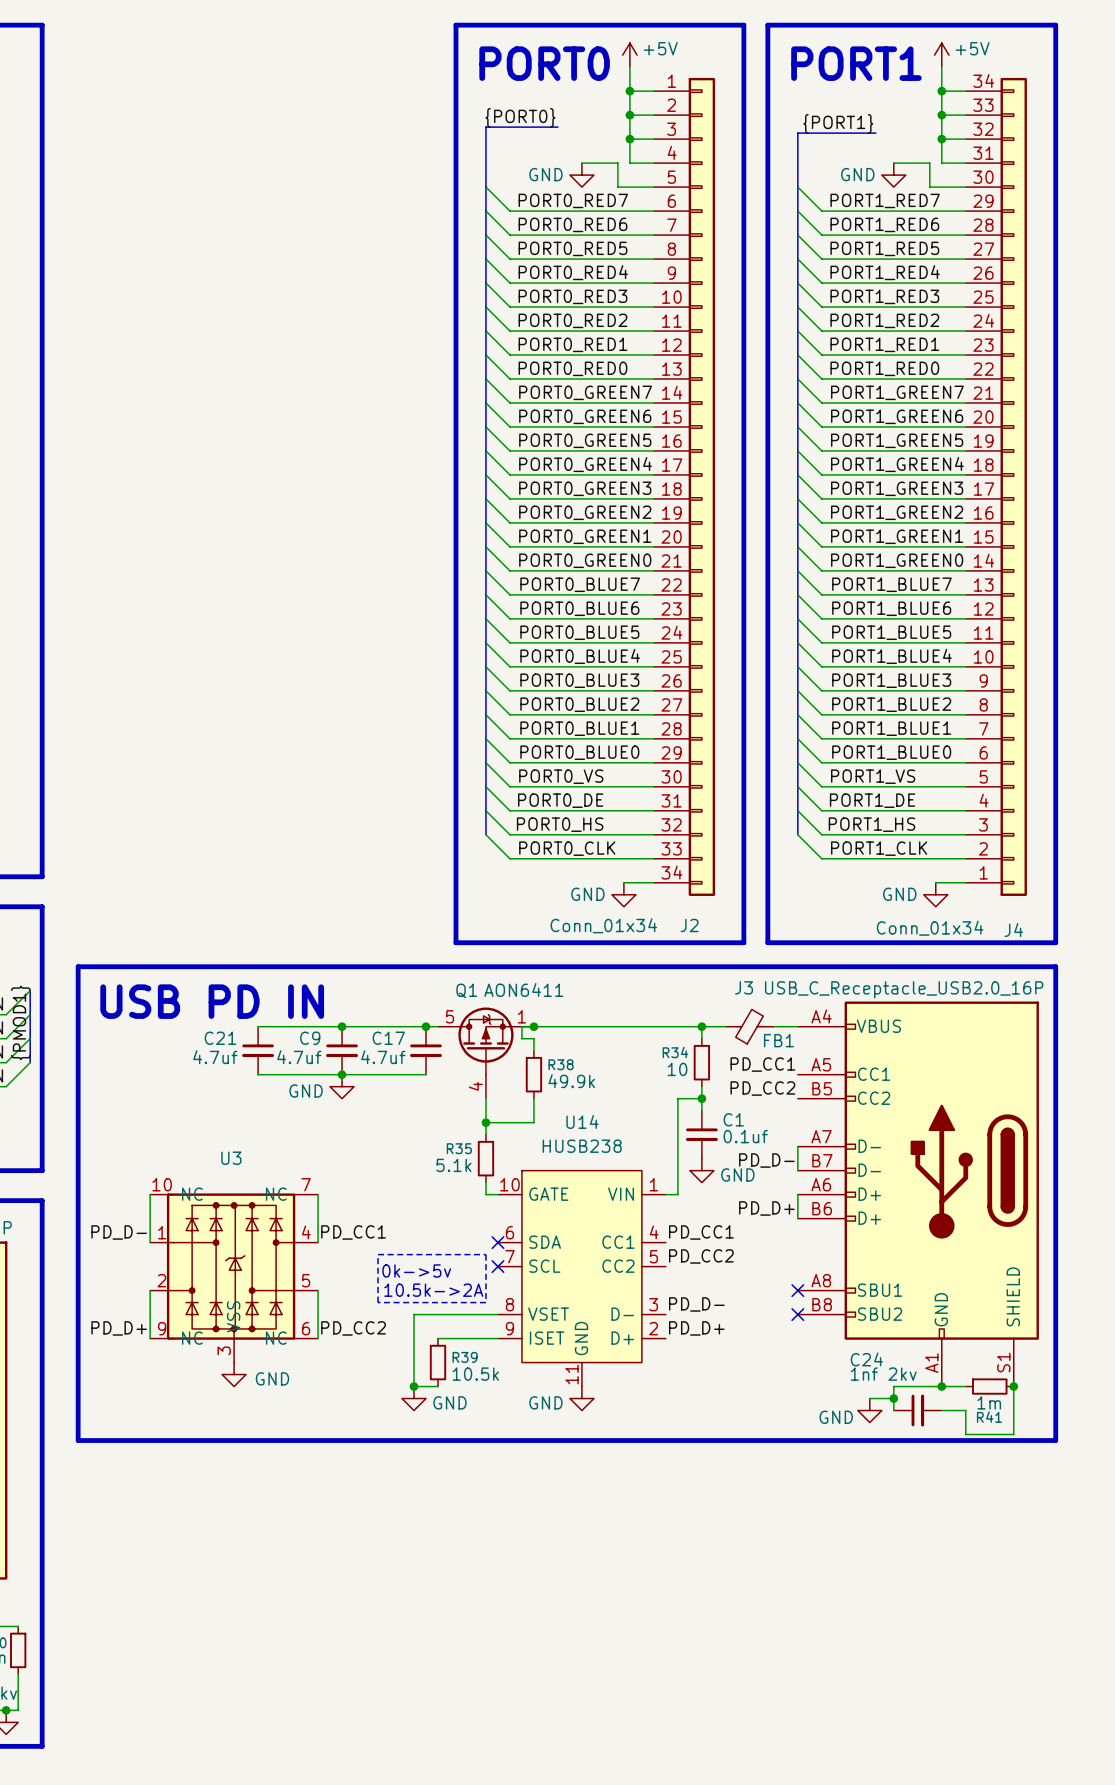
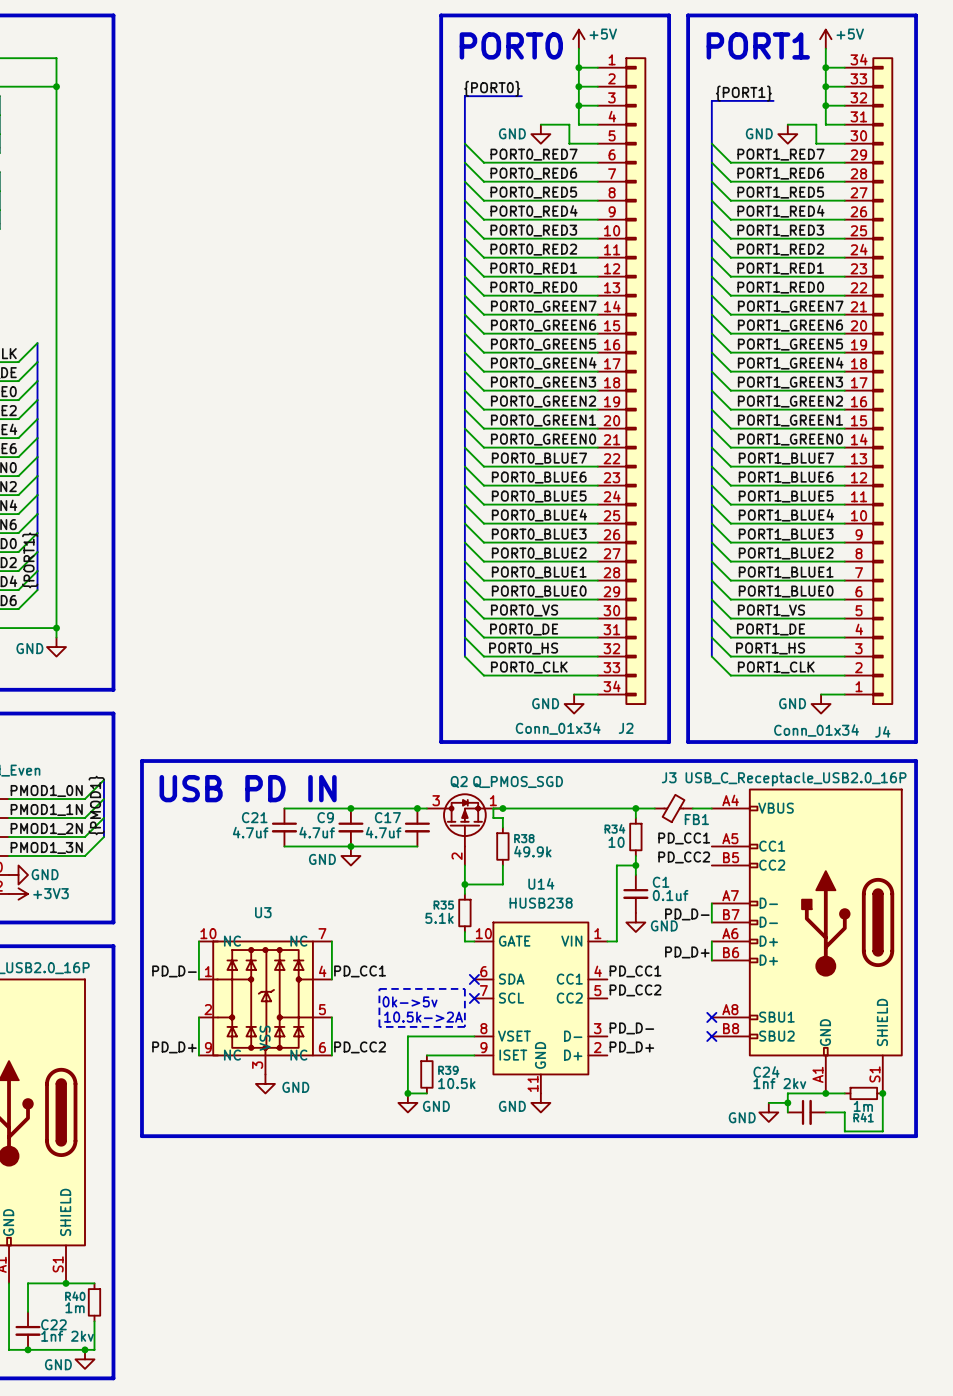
Q1: AON6411 (485, 1053) -> none
Q2: none -> Q_PMOS_SGD (464, 829)

